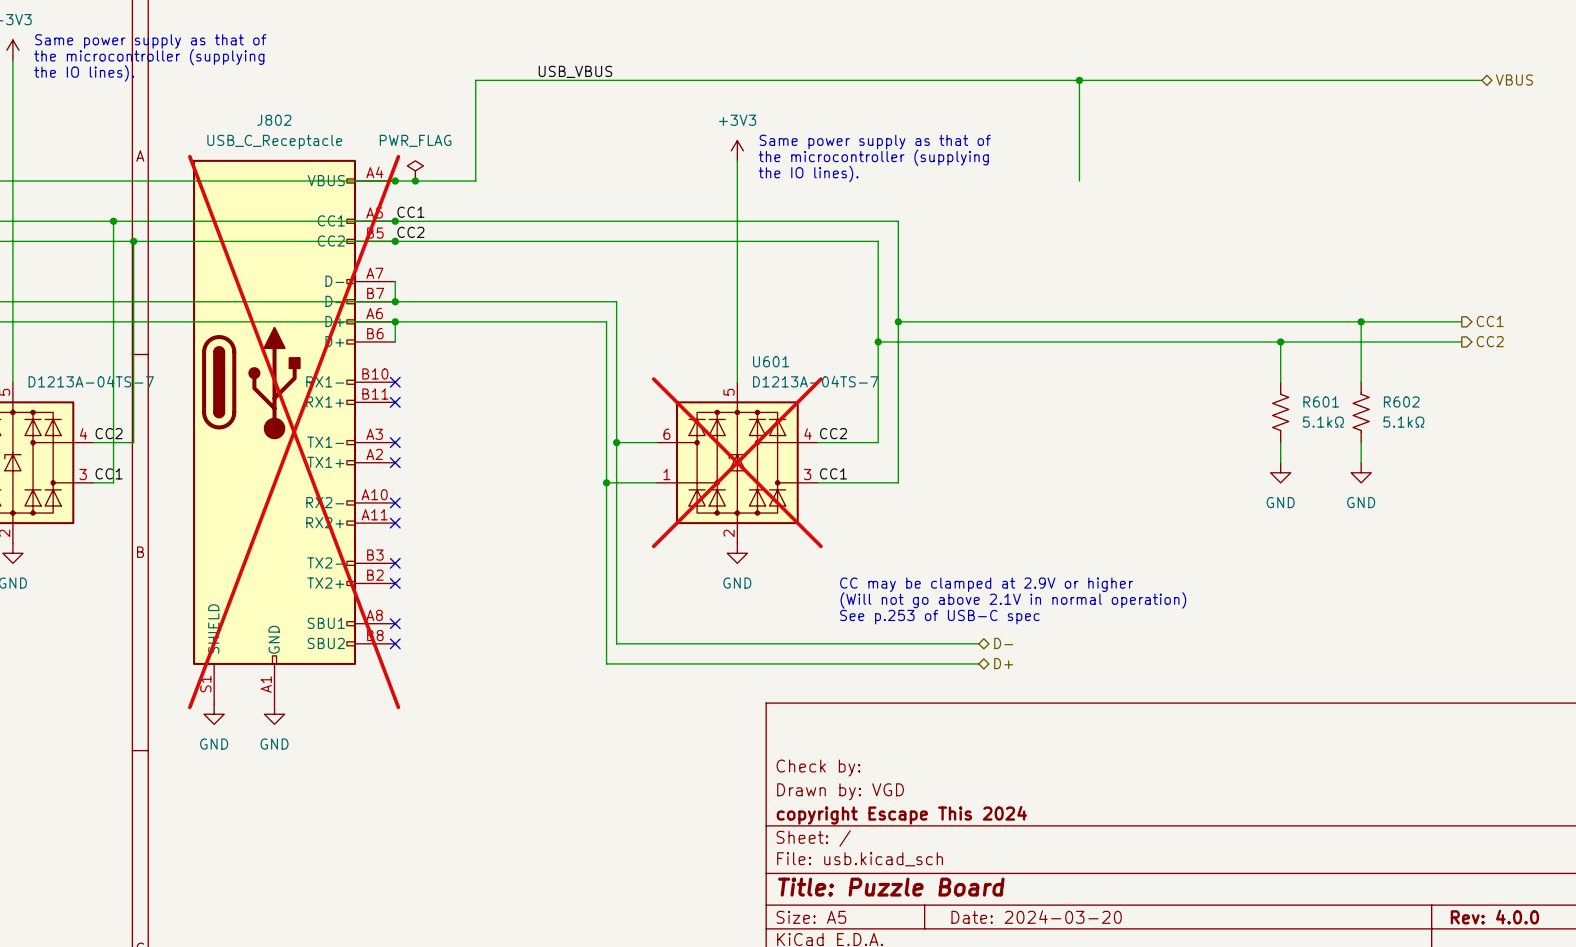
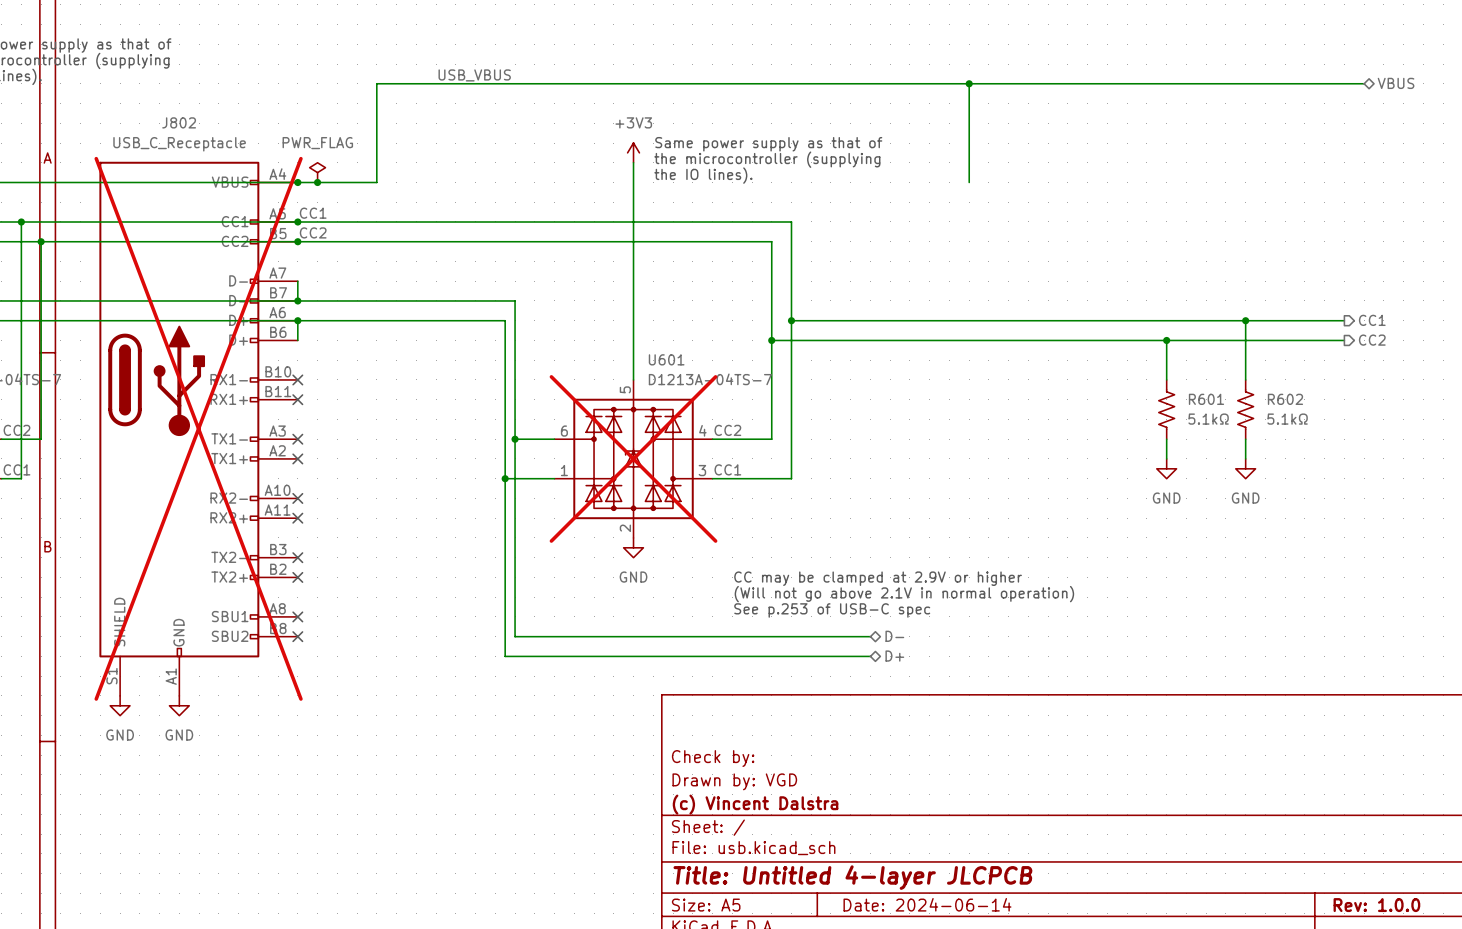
title block: copyright Escape This 2024 (901, 815) -> (c) Vincent Dalstra (755, 804)
title block: Title: Puzzle Board (891, 887) -> Title: Untitled 4-layer JLCPCB (852, 877)
title block: Date: 2024-03-20 (1036, 917) -> Date: 2024-06-14 (927, 904)
title block: Rev: 4.0.0 (1494, 917) -> Rev: 1.0.0 (1376, 905)

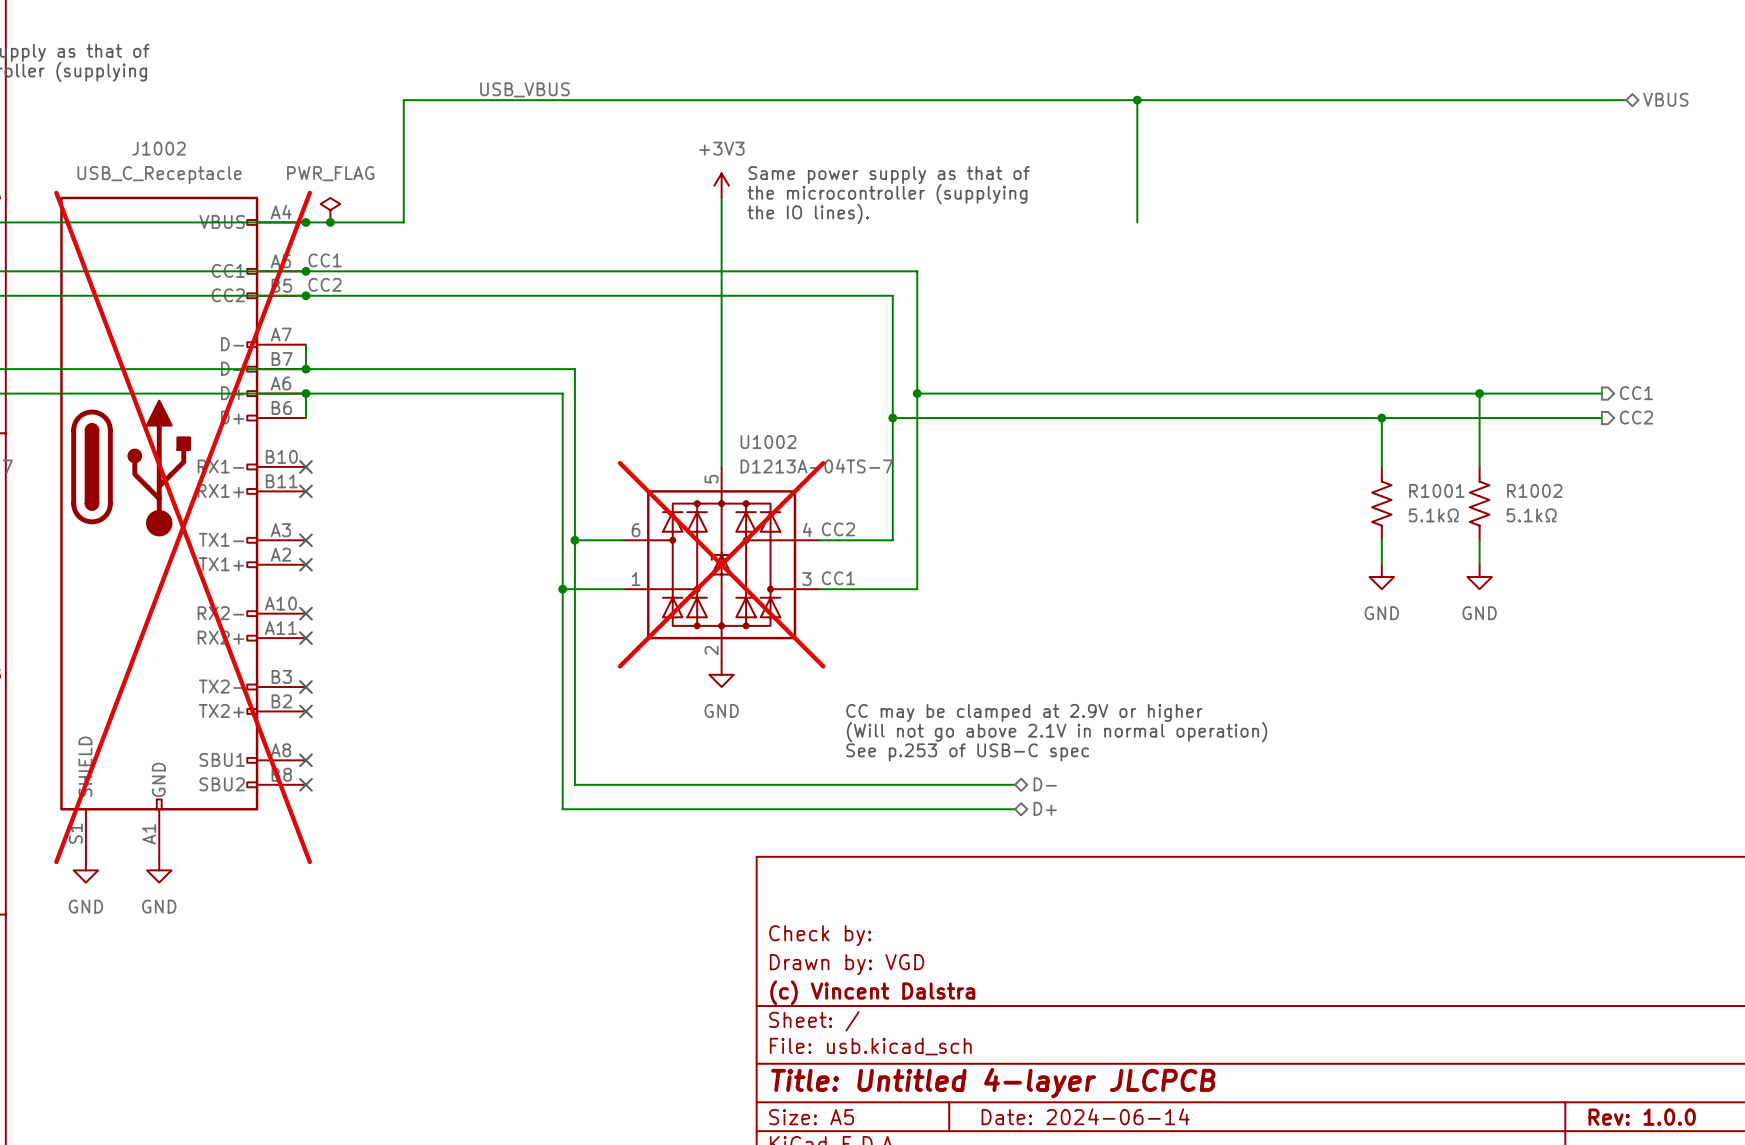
J802 name: J802 (179, 122) -> J1002 (158, 148)
U601 name: U601 (666, 359) -> U1002 (768, 442)
R601 name: R601 (1206, 399) -> R1001 (1436, 490)
R602 name: R602 (1285, 399) -> R1002 (1534, 490)

